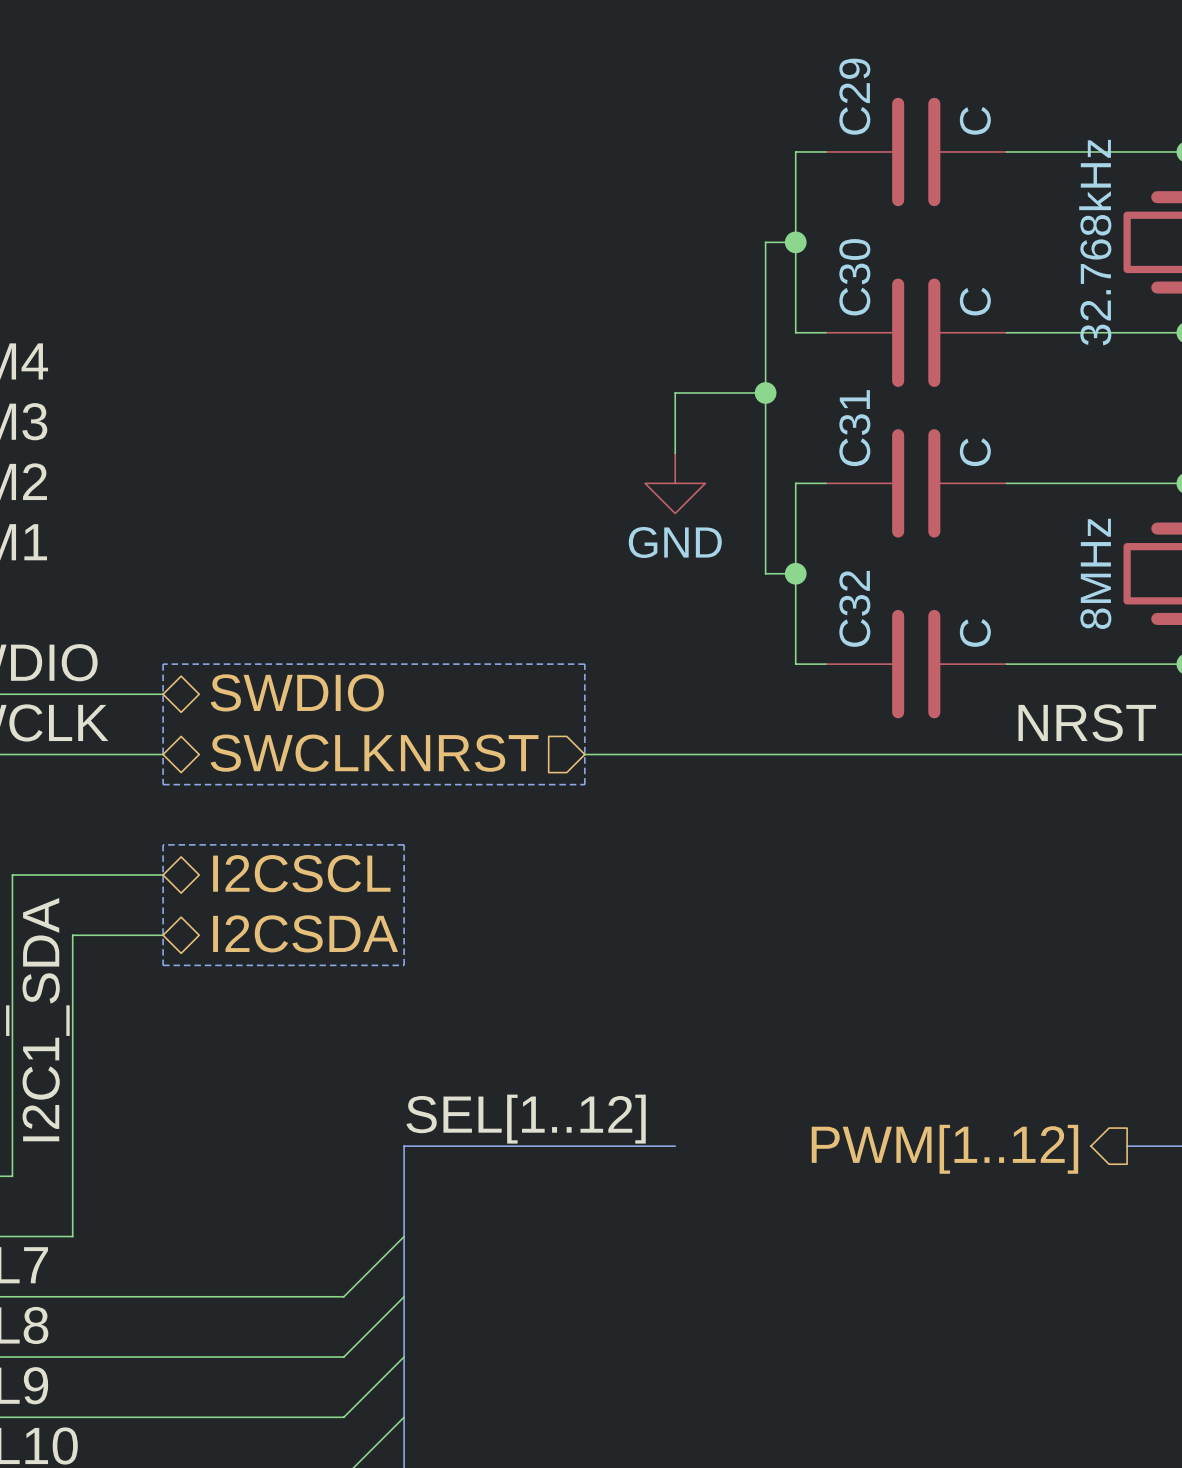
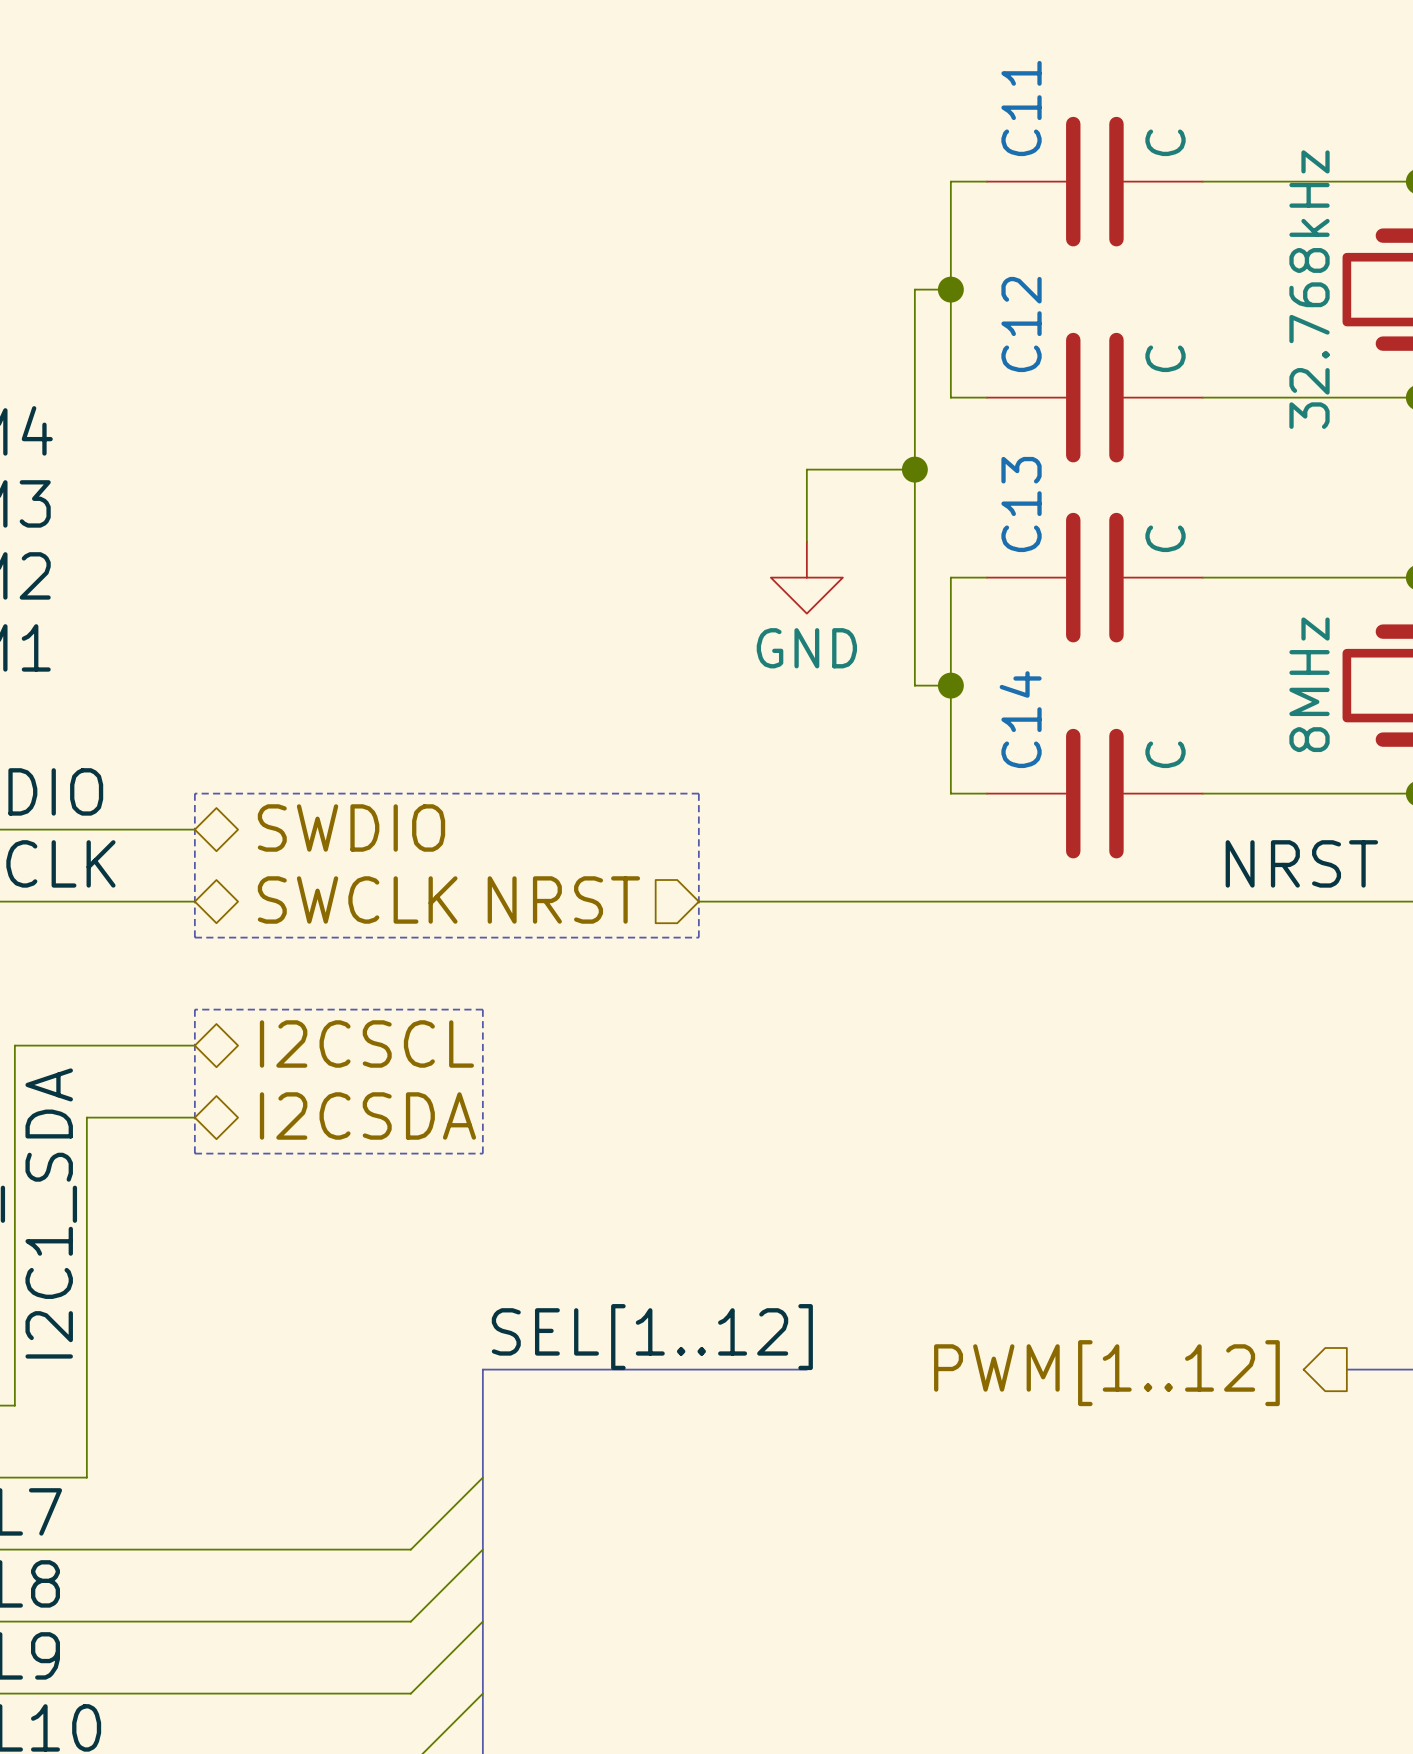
C29 name: C29 (854, 96) -> C11 (1021, 108)
C30 name: C30 (854, 277) -> C12 (1021, 324)
C31 name: C31 (854, 428) -> C13 (1021, 504)
C32 name: C32 (854, 608) -> C14 (1020, 719)

